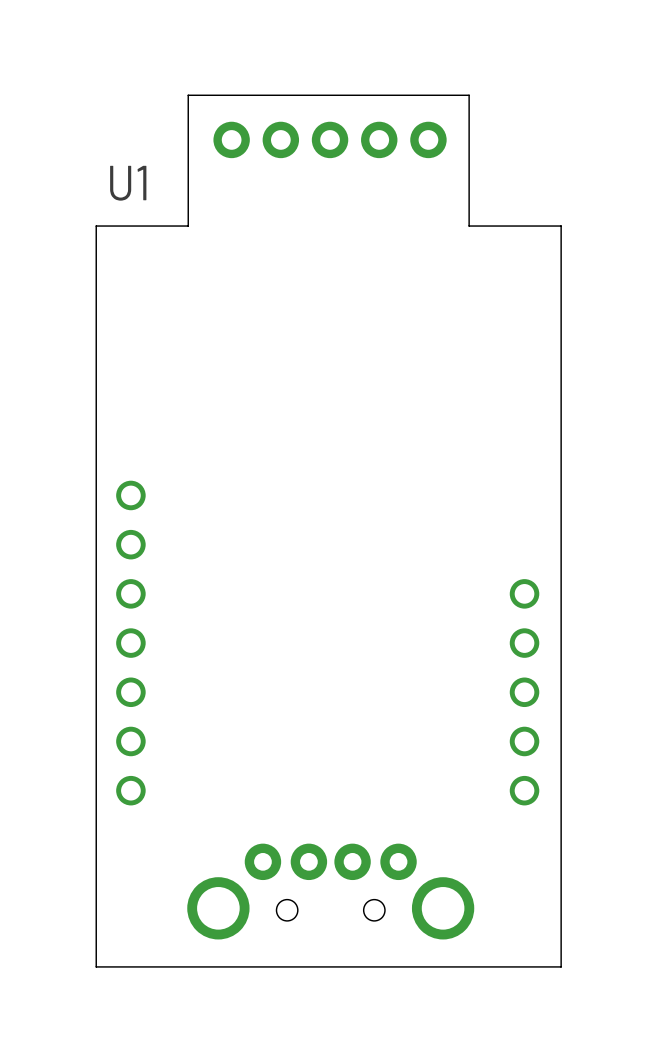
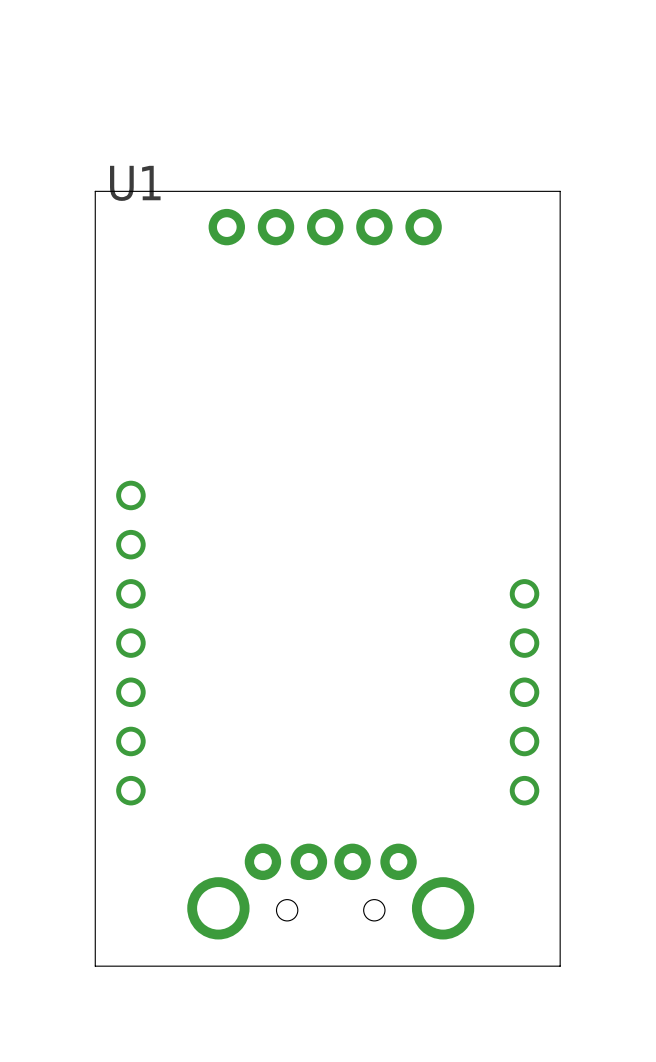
board edge: (469, 95) (469, 226) (561, 226) (561, 966) (96, 966) (96, 226) (188, 226) (188, 95) (469, 95) -> (560, 191) (560, 966) (95, 966) (95, 191) (560, 191)
part position: (330, 139) -> (325, 227)

